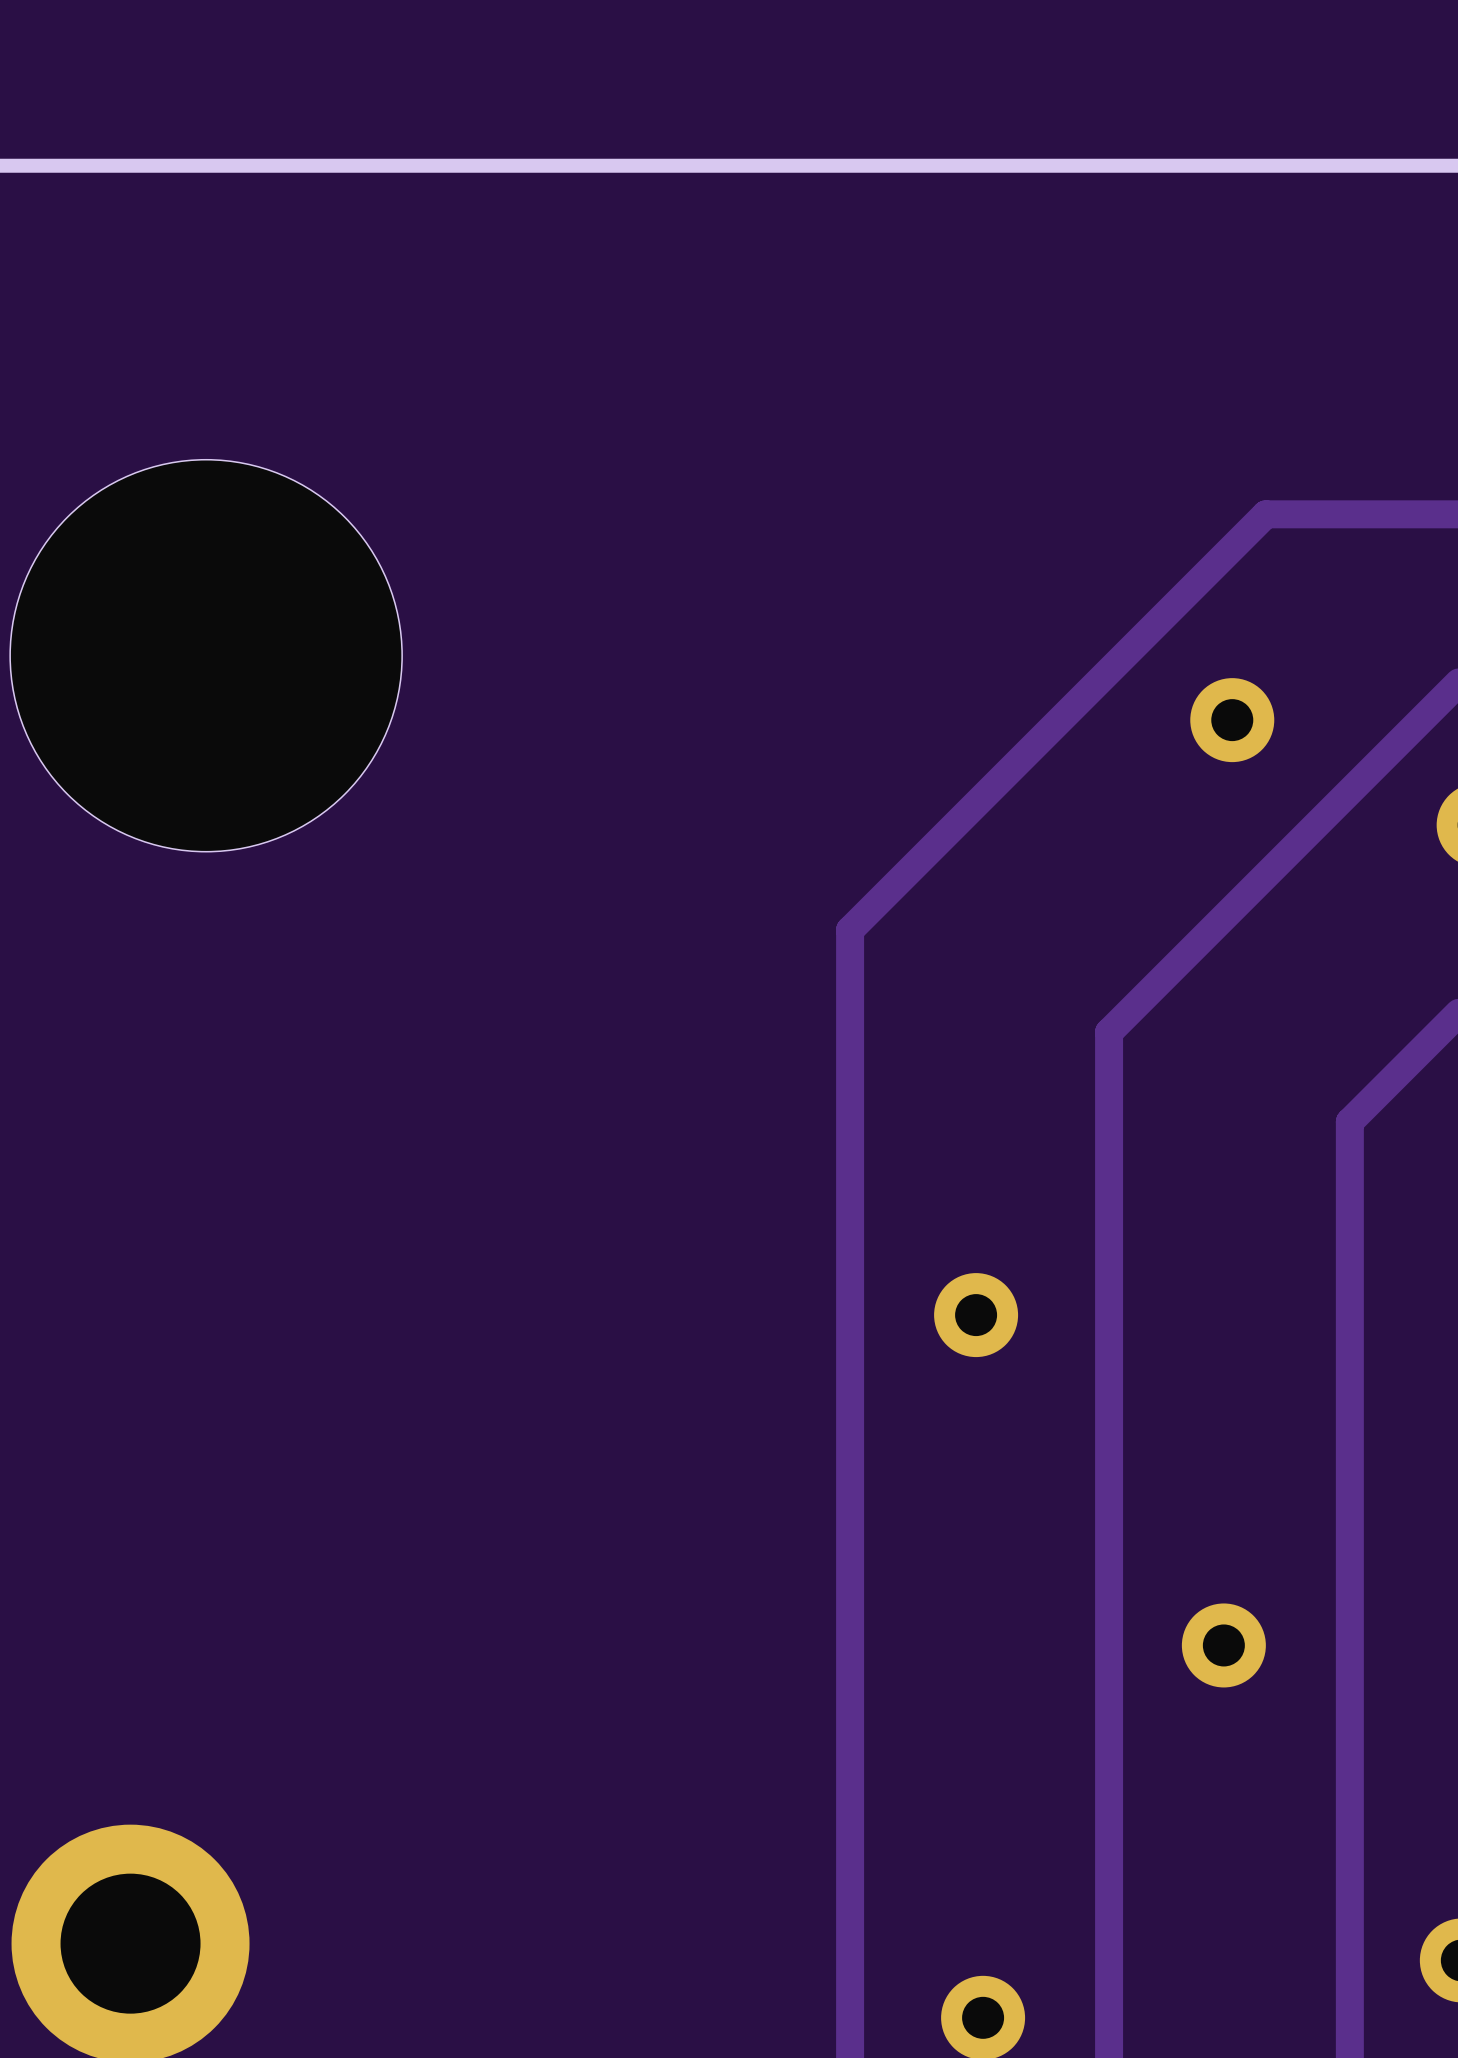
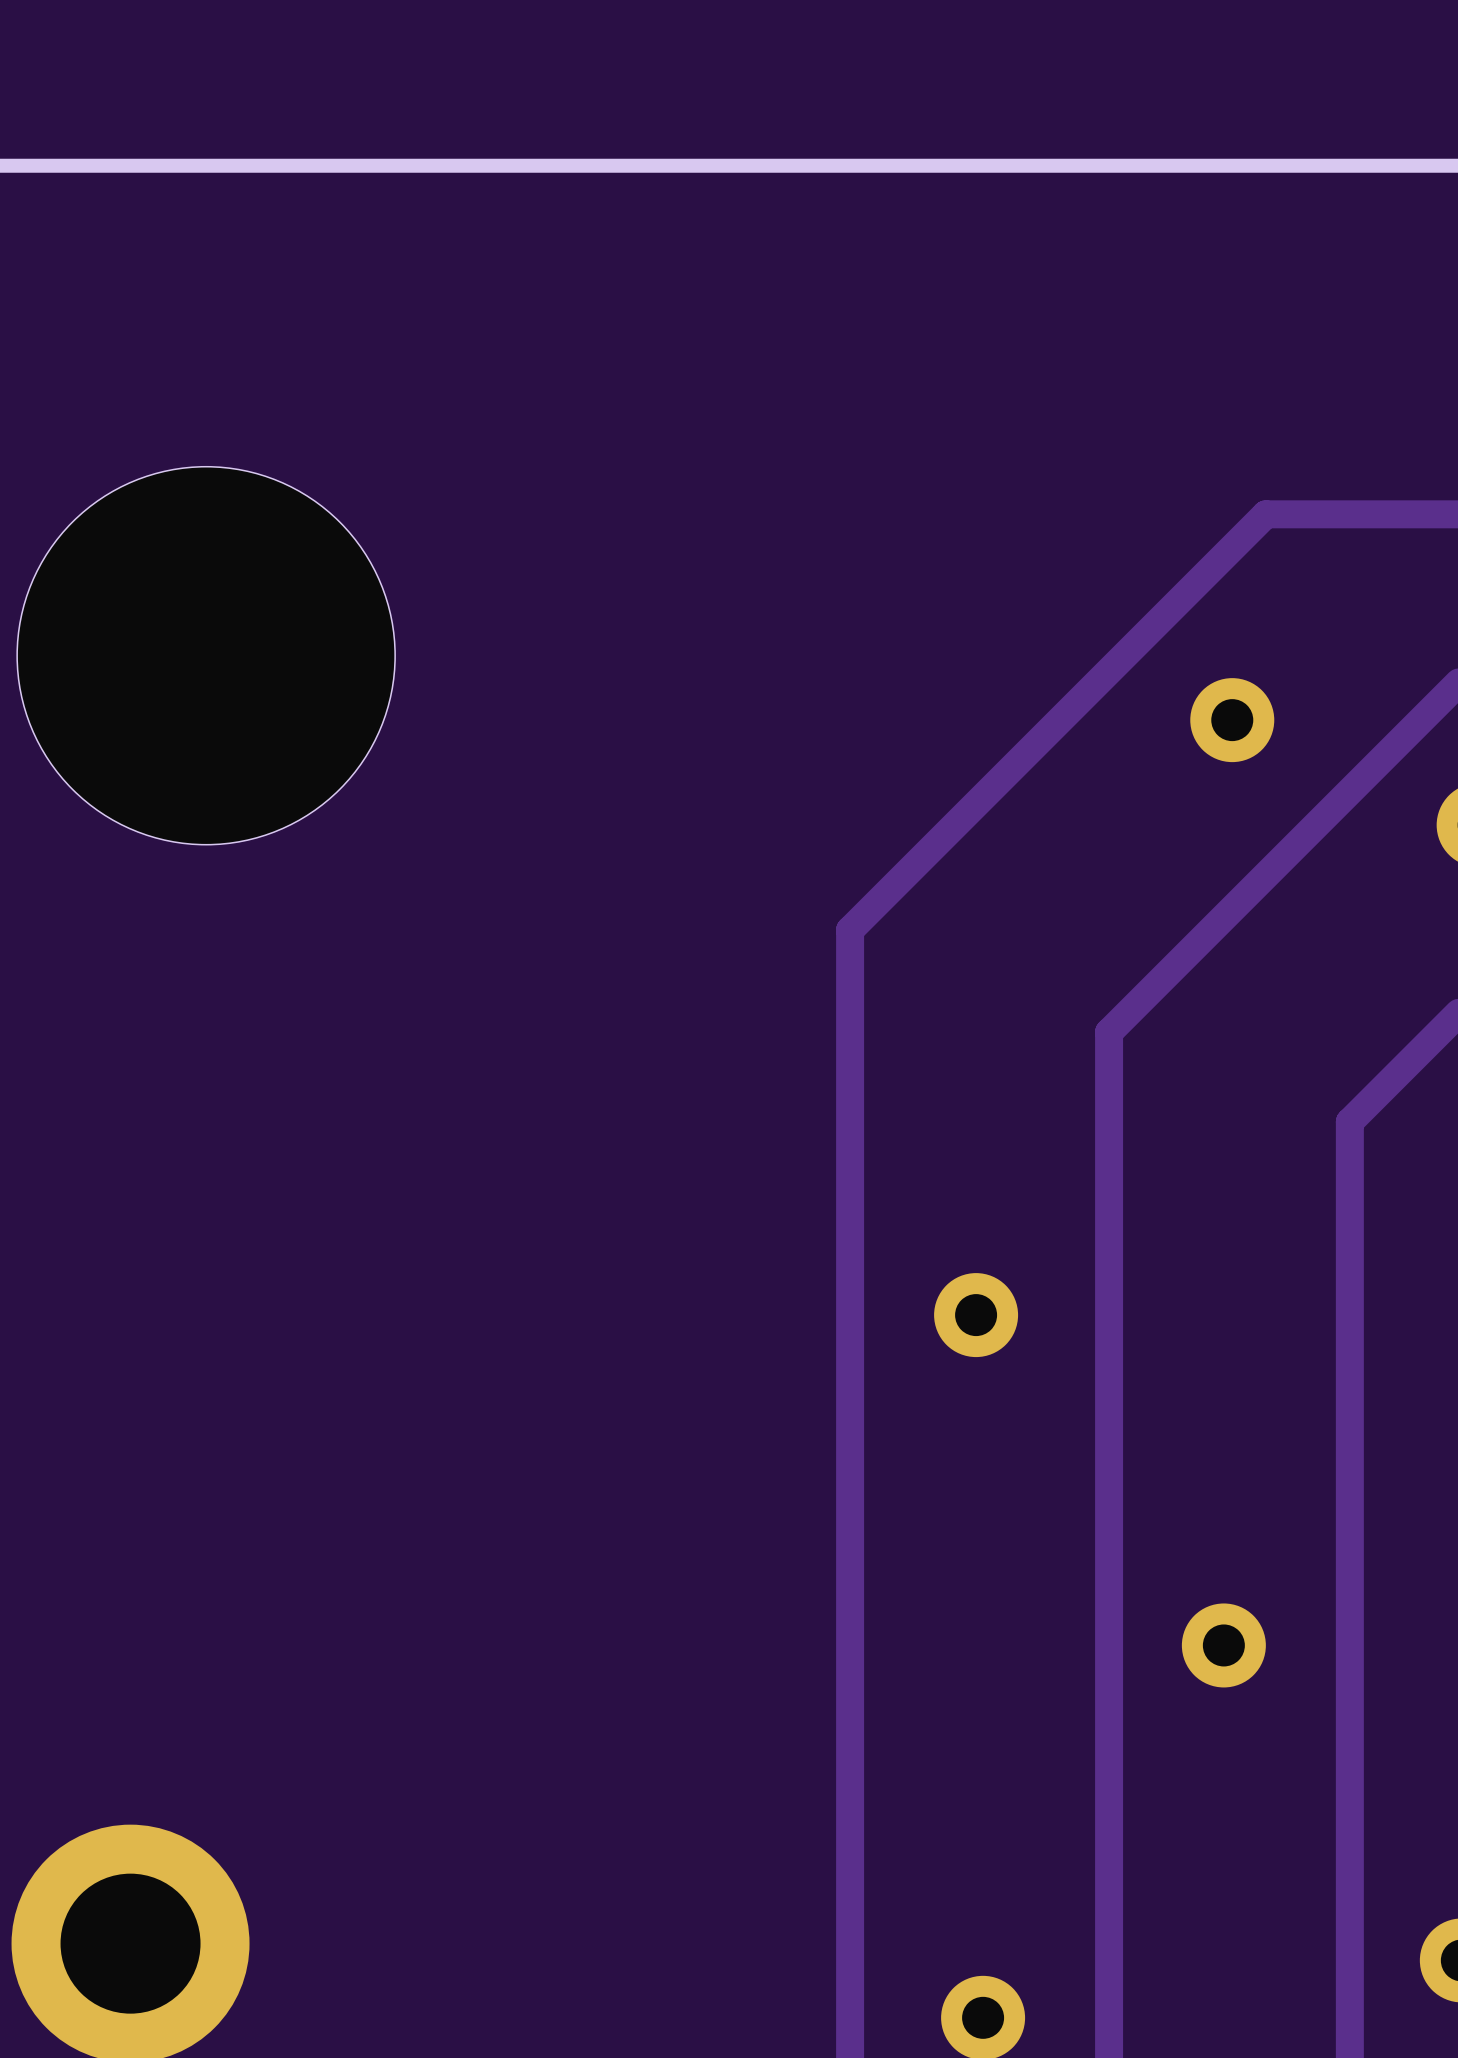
part footprint: [10, 459, 403, 852] -> [17, 466, 396, 845]

